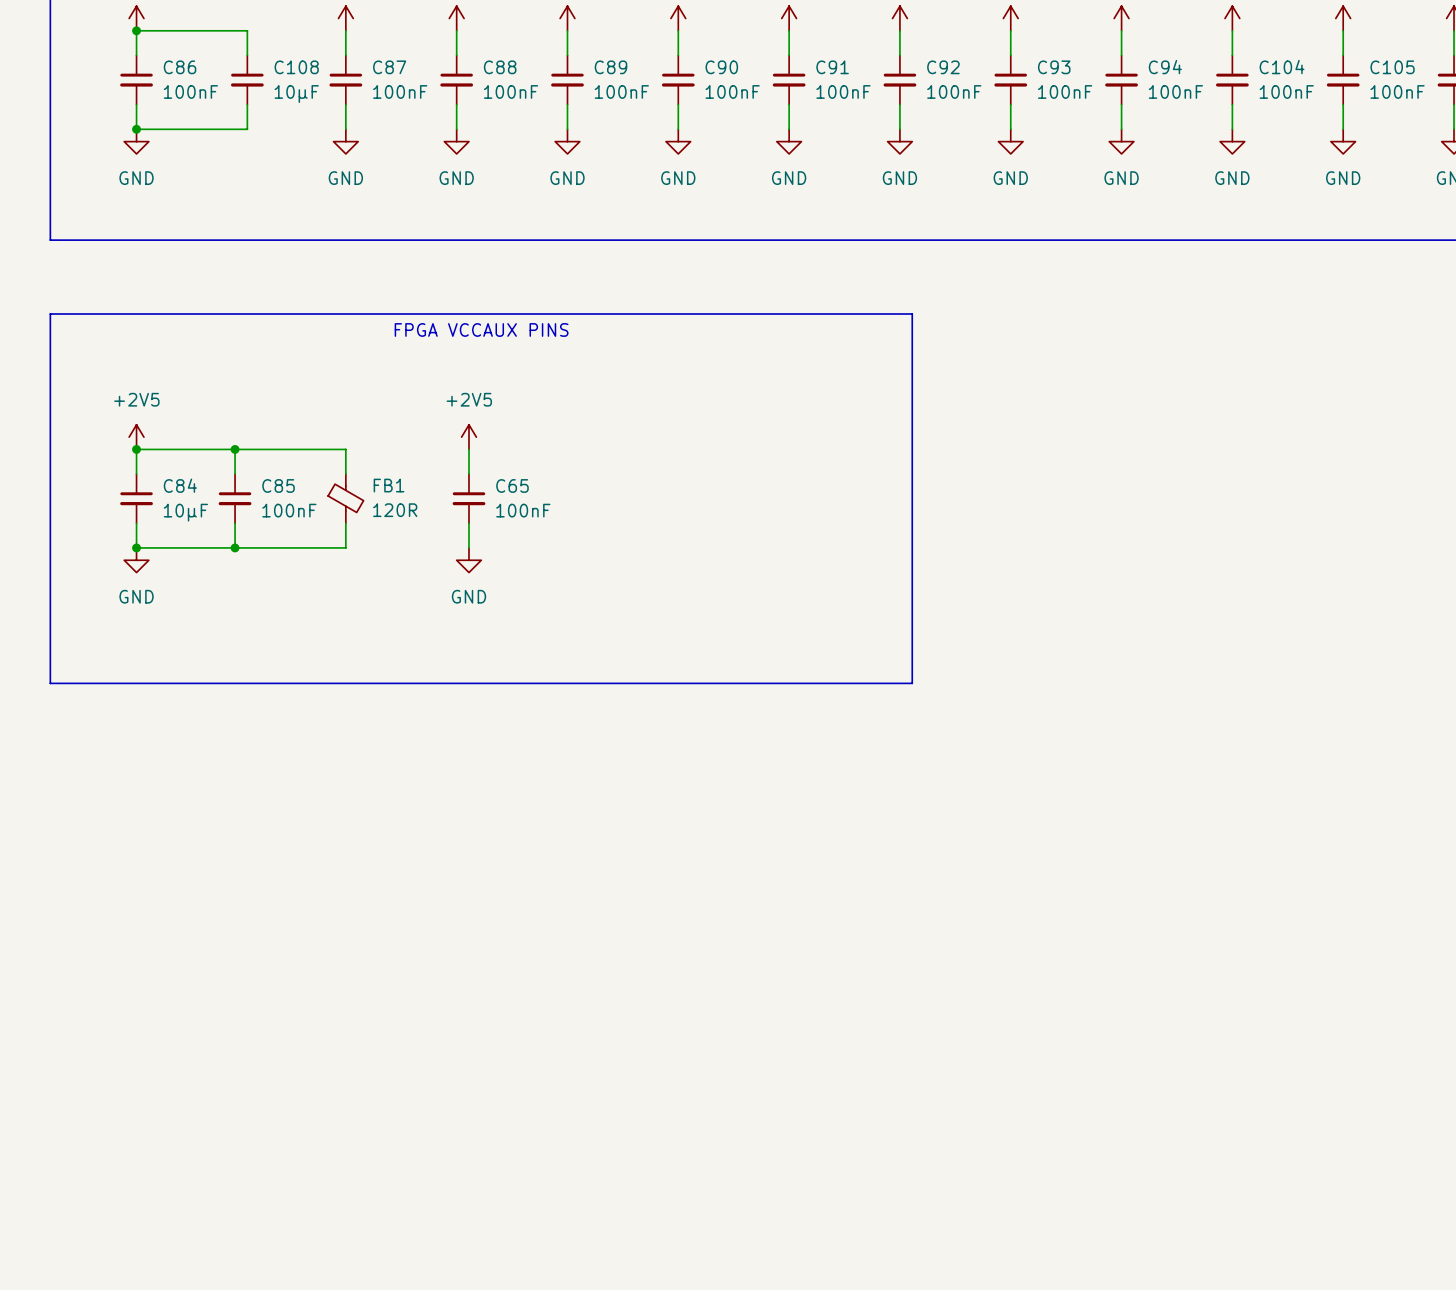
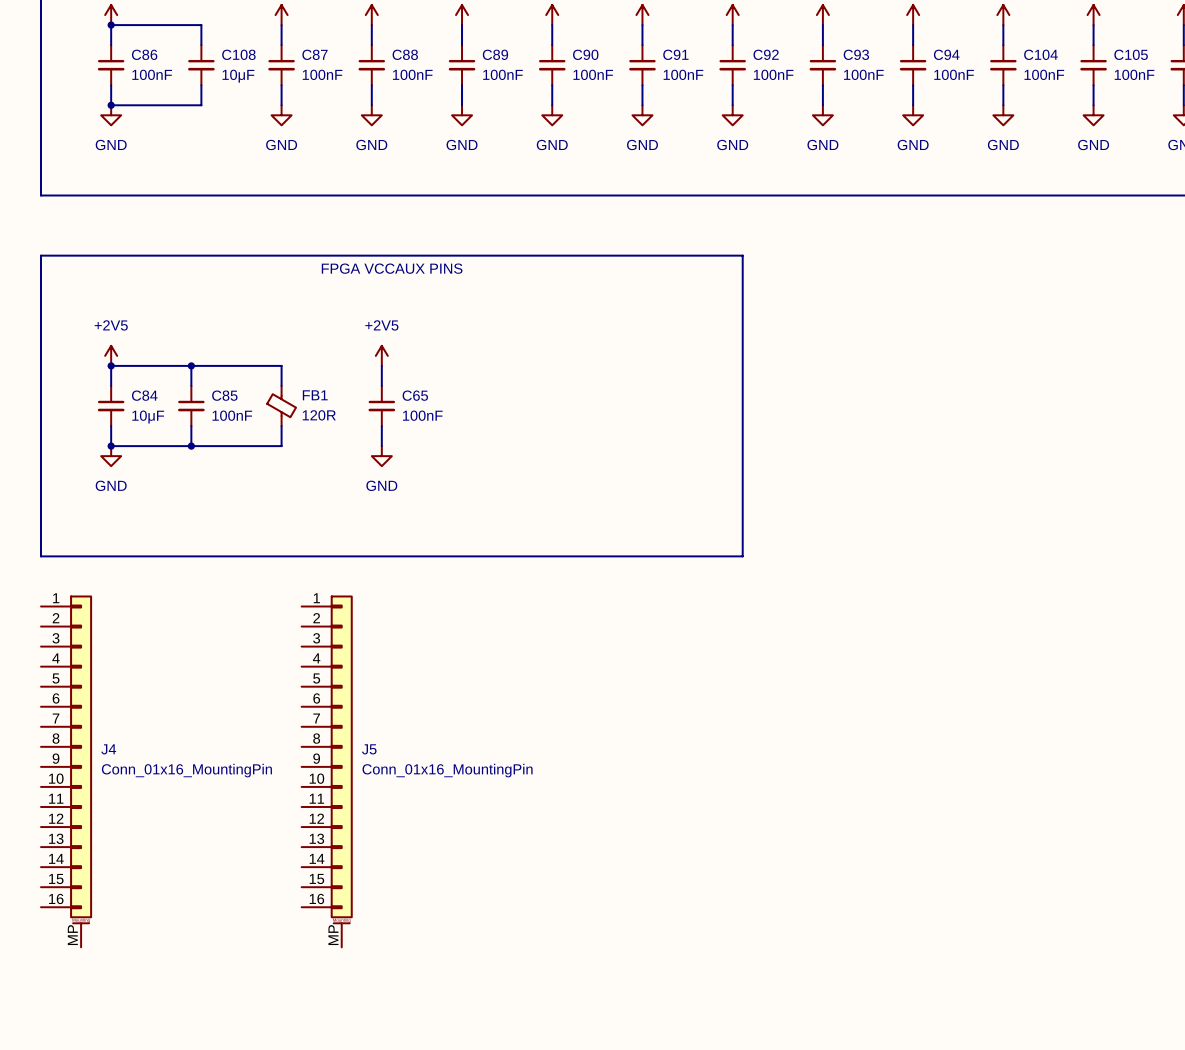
J4: none -> Conn_01x16_MountingPin (66, 771)
J5: none -> Conn_01x16_MountingPin (327, 771)

